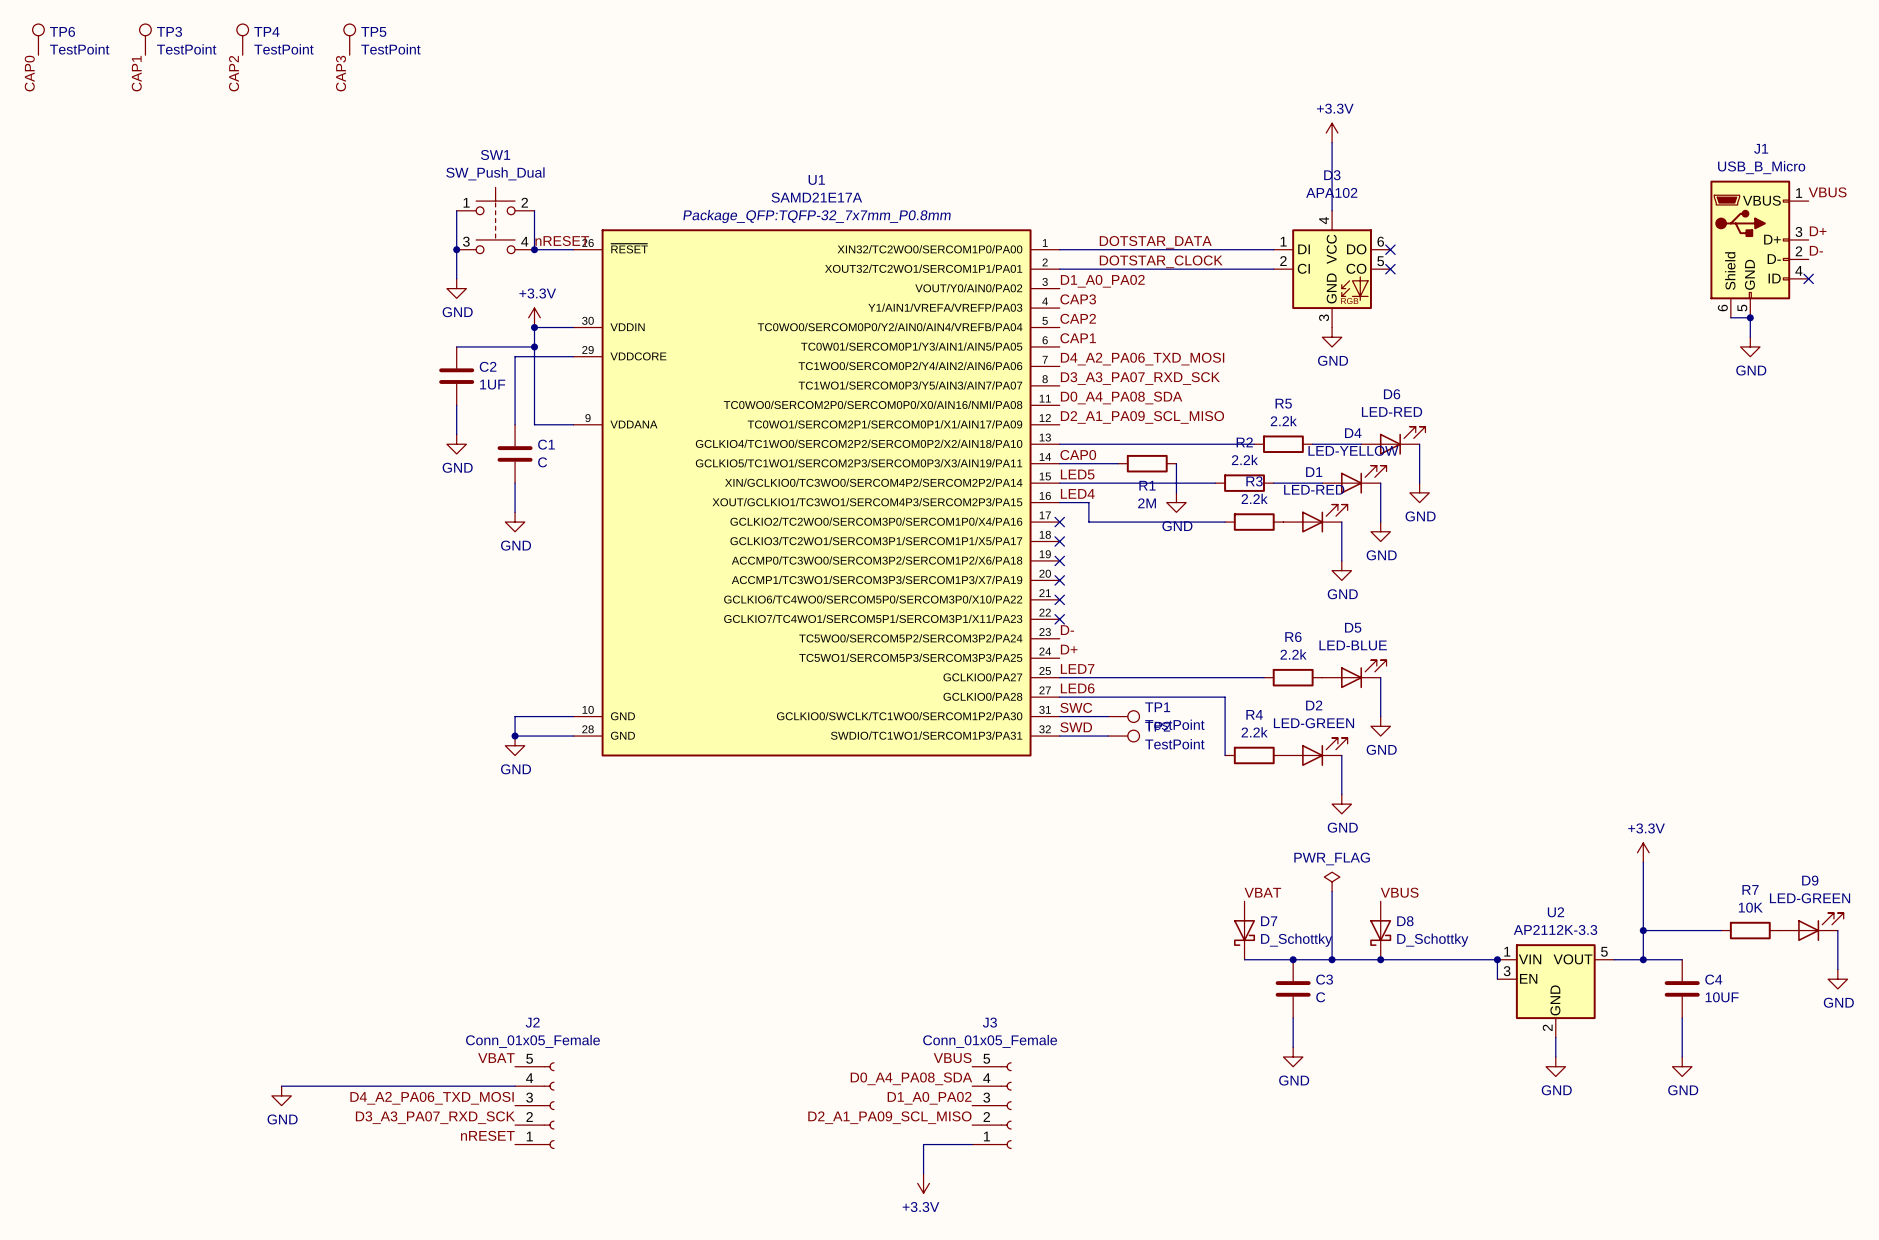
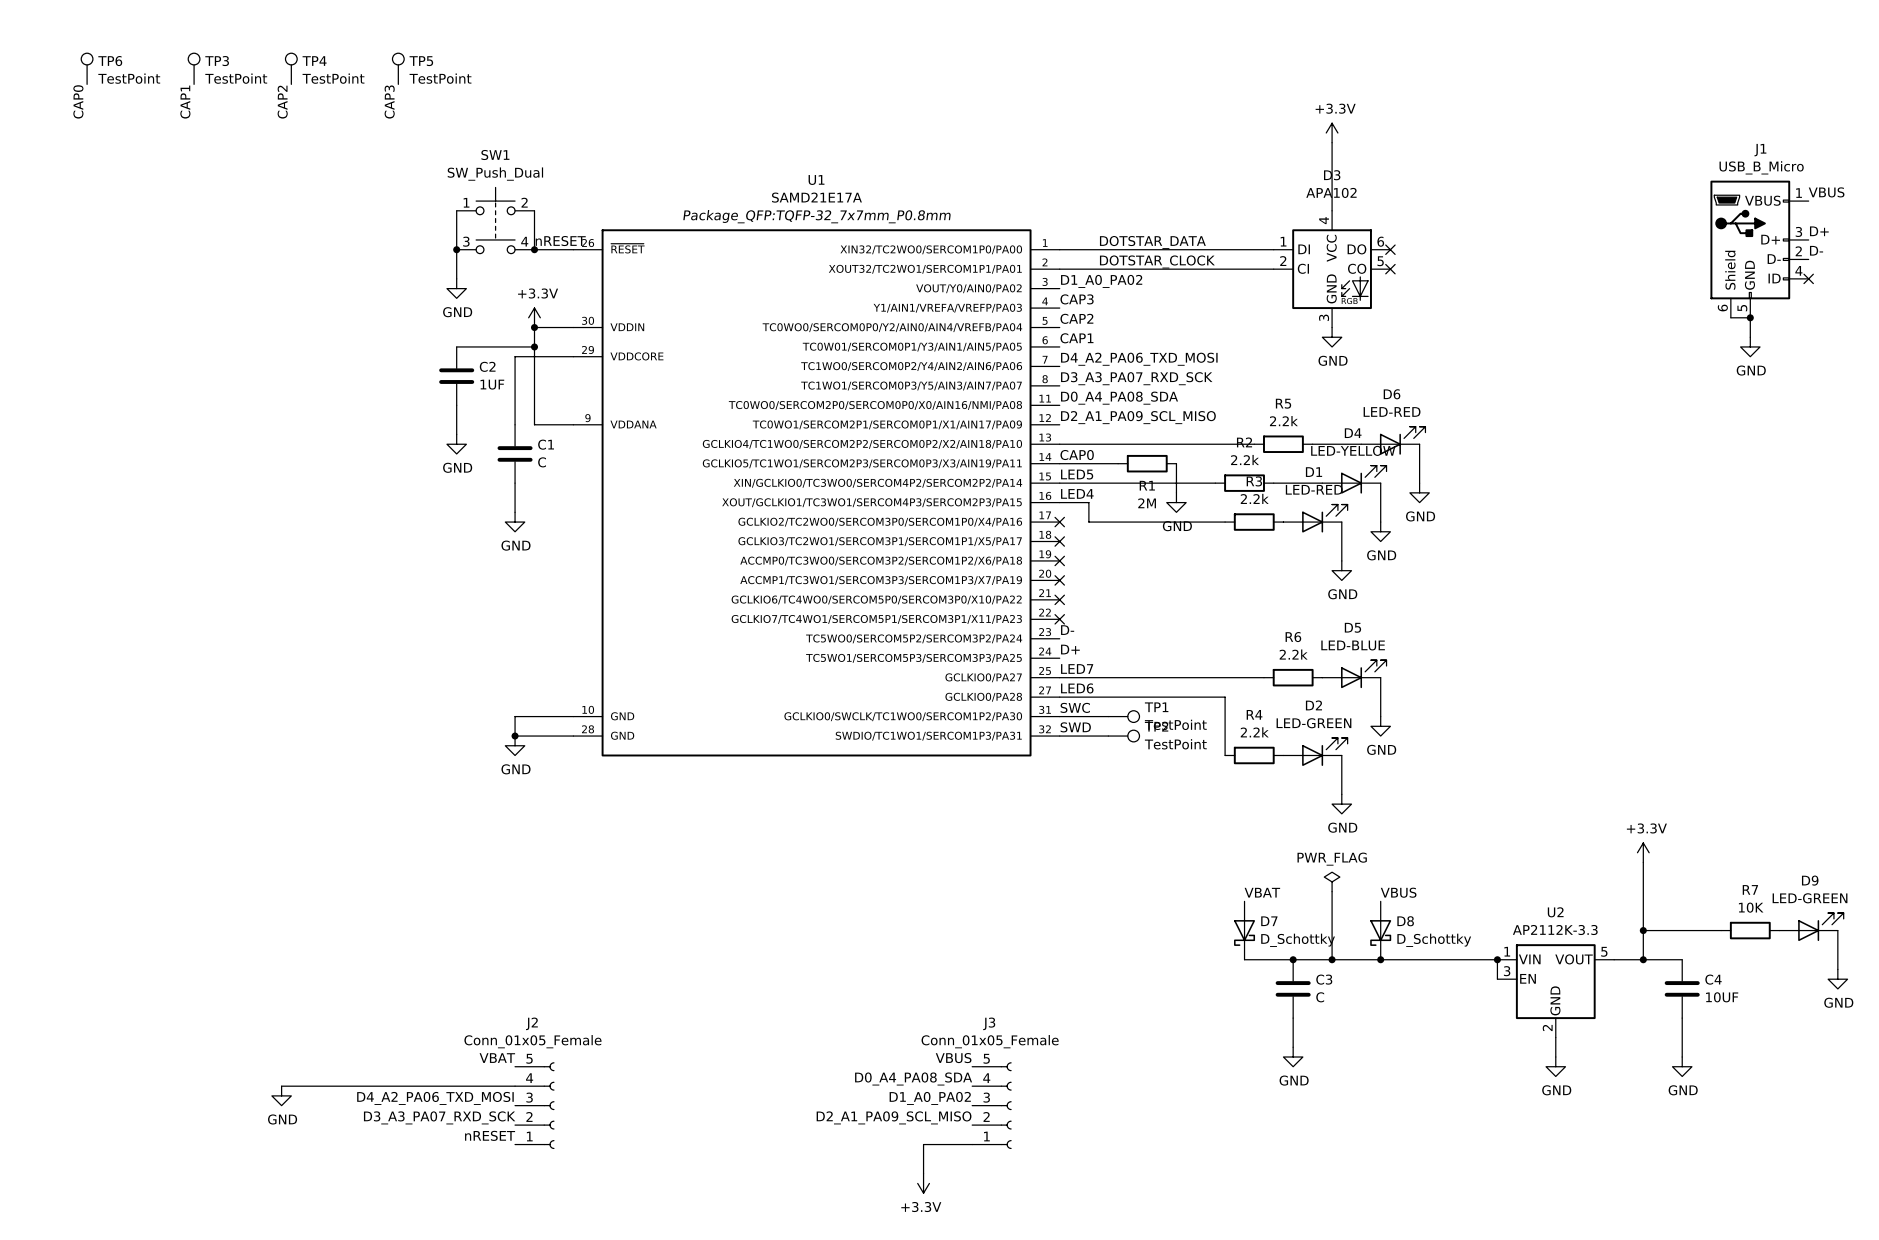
TP6 position: (38, 39) -> (87, 68)
TP3 position: (145, 39) -> (194, 68)
TP4 position: (242, 39) -> (291, 68)
TP5 position: (349, 39) -> (398, 68)
label position: CAP0 (29, 73) -> CAP0 (78, 101)
label position: CAP1 (136, 73) -> CAP1 (185, 102)
label position: CAP2 (234, 73) -> CAP2 (282, 102)
label position: CAP3 (341, 73) -> CAP3 (389, 102)

